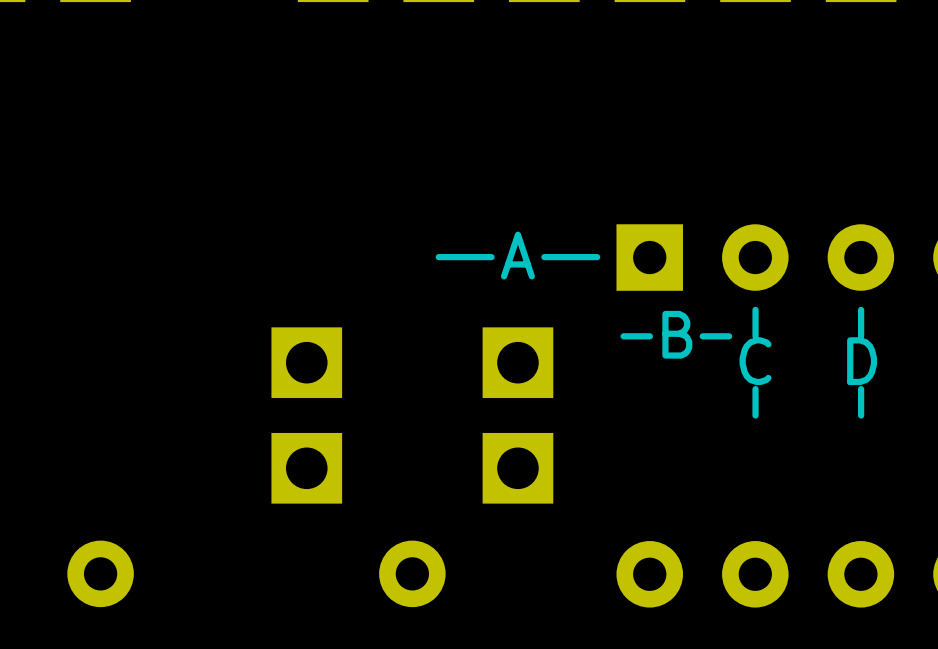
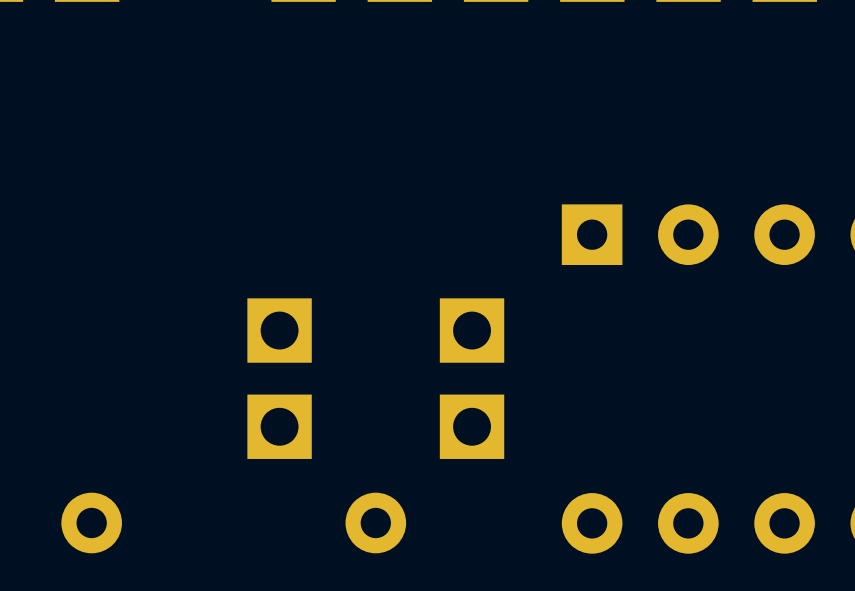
text: A (517, 255) -> none
line: (491, 257) (438, 257) -> none
line: (597, 257) (544, 257) -> none
line: (755, 309) (755, 336) -> none
line: (861, 309) (861, 336) -> none
text: B (677, 334) -> none
line: (649, 336) (623, 336) -> none
line: (729, 336) (702, 336) -> none
text: C (755, 361) -> none
text: D (862, 361) -> none
line: (755, 389) (755, 415) -> none
line: (861, 389) (861, 415) -> none

